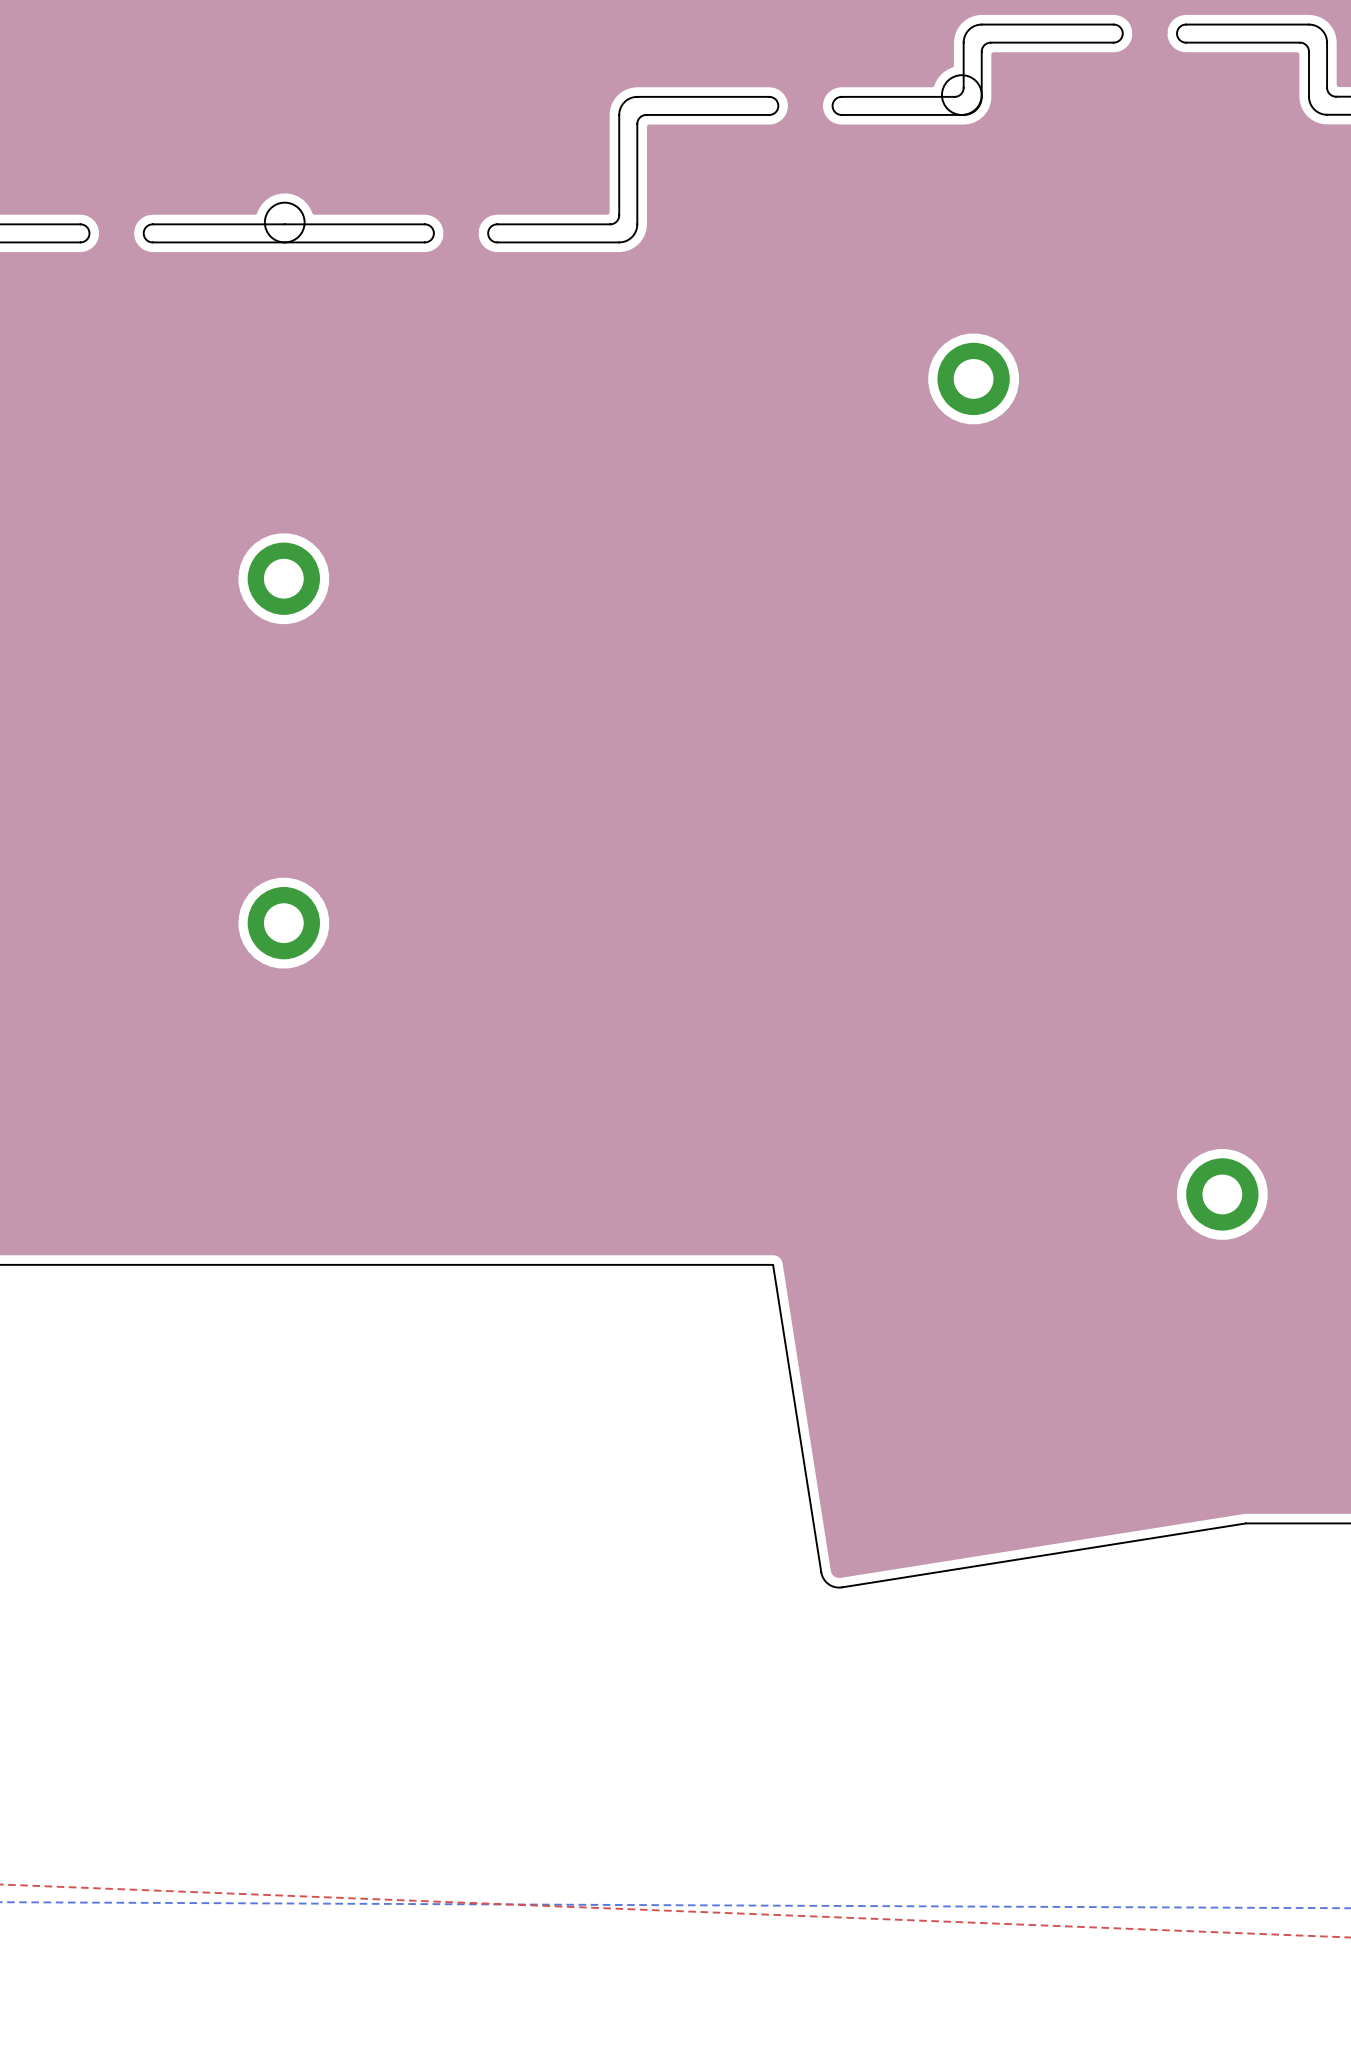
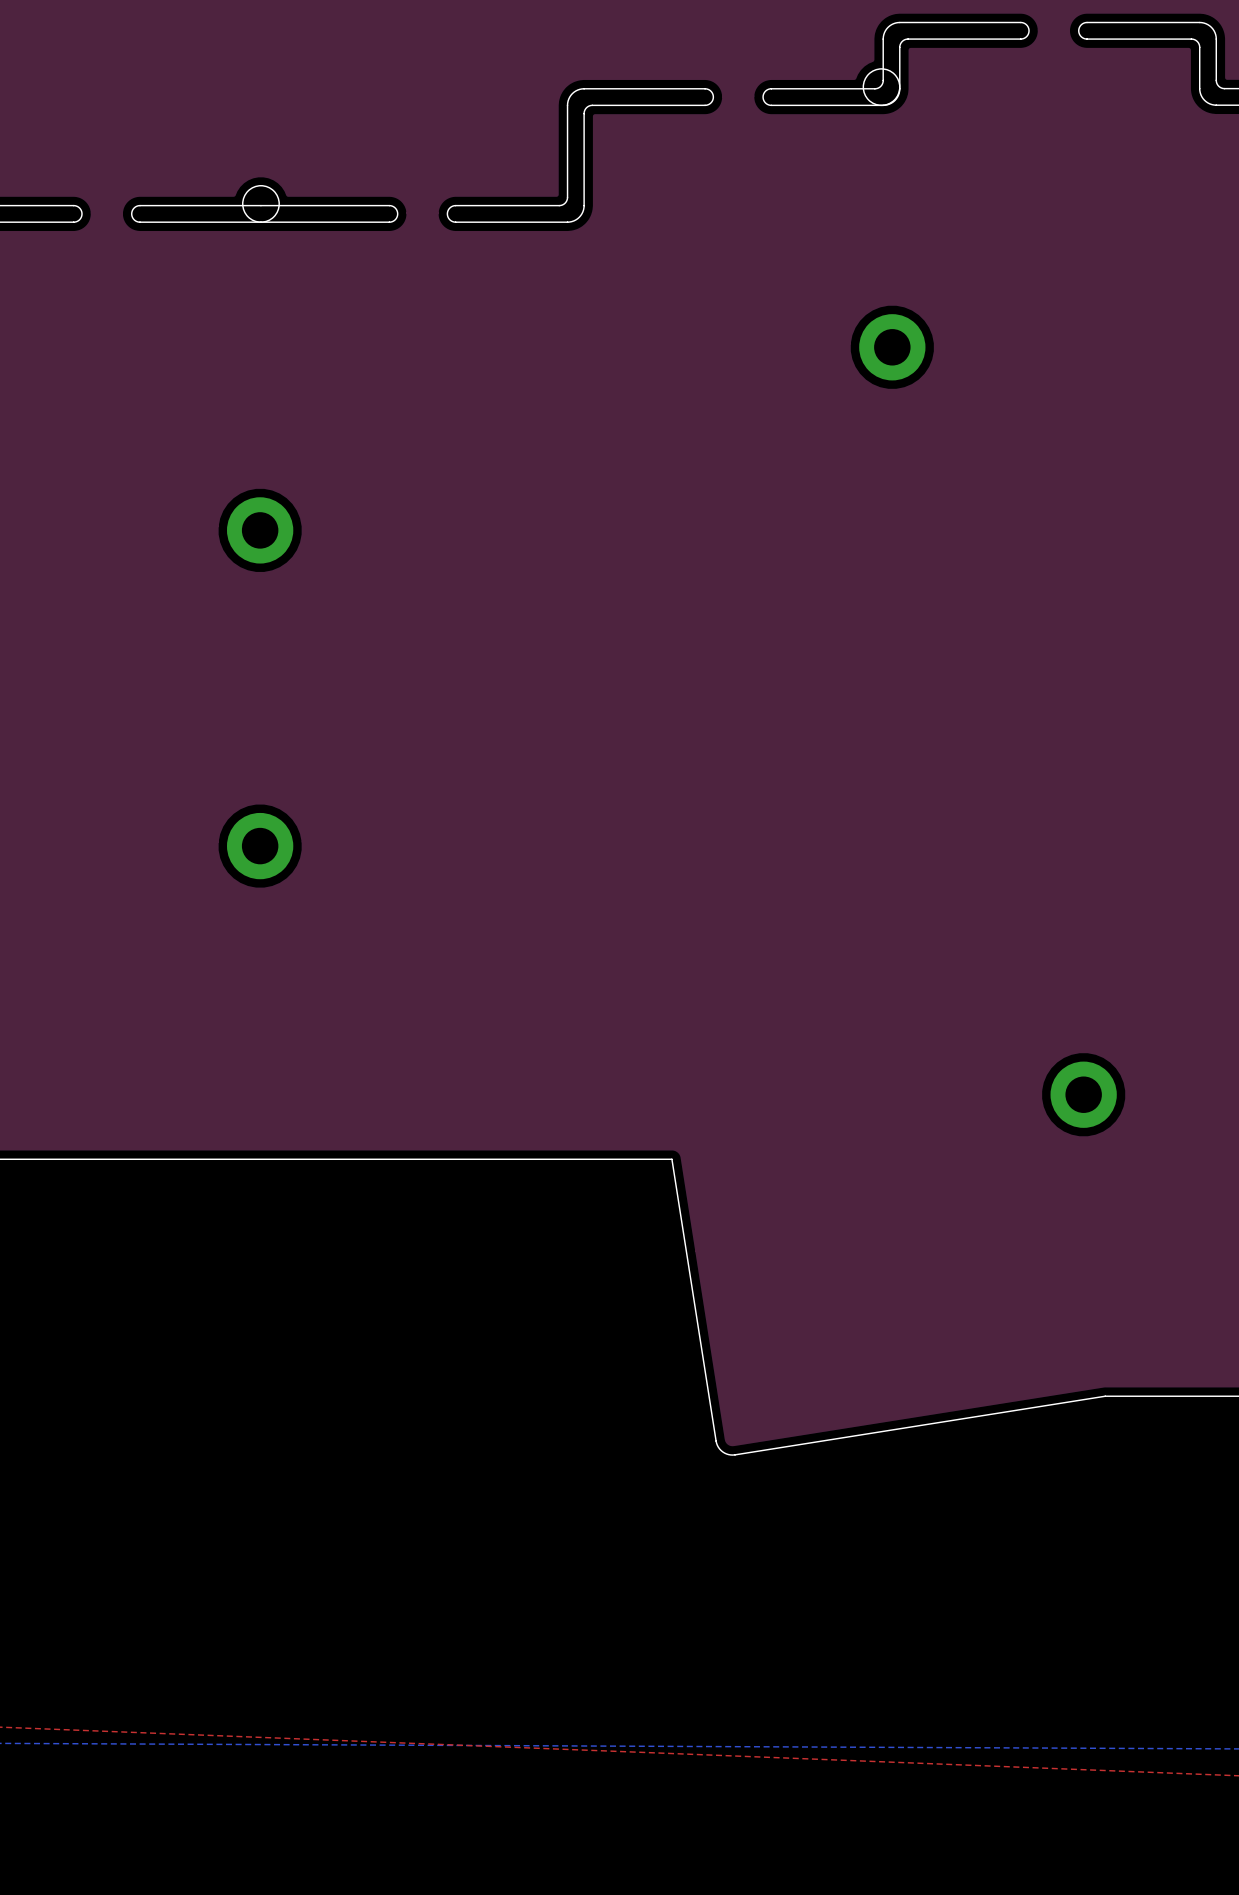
part position: (1222, 1194) -> (1083, 1094)
board edge: (733, 1264) (773, 1264) (821, 1572) (823, 1578) (830, 1585) (841, 1587) (1245, 1523) -> (671, 1159) (716, 1441) (718, 1447) (724, 1453) (735, 1454) (1105, 1396) (1141, 1396)

